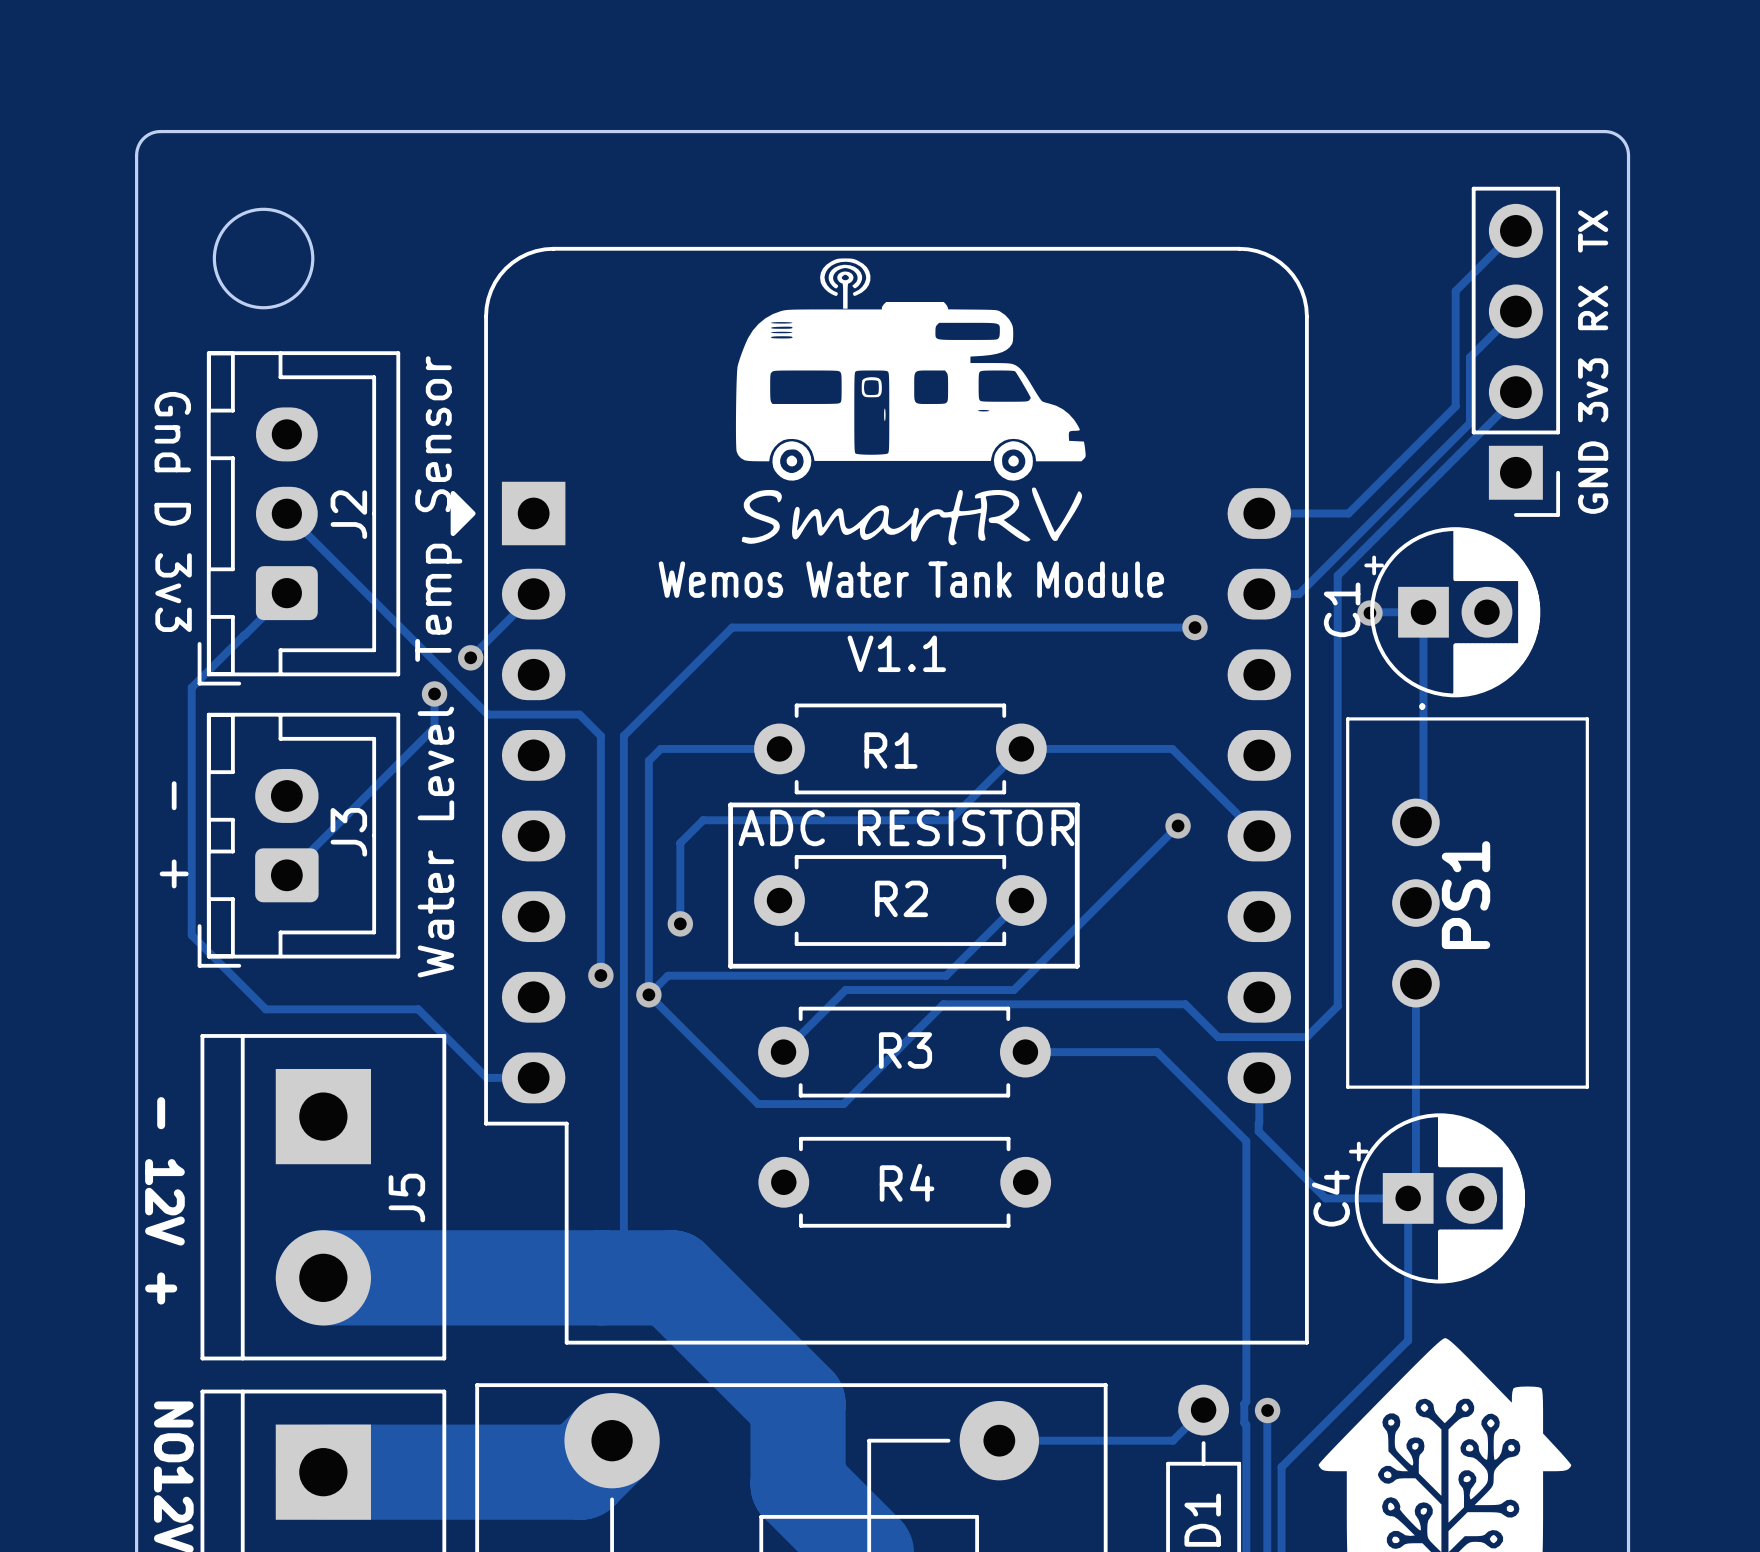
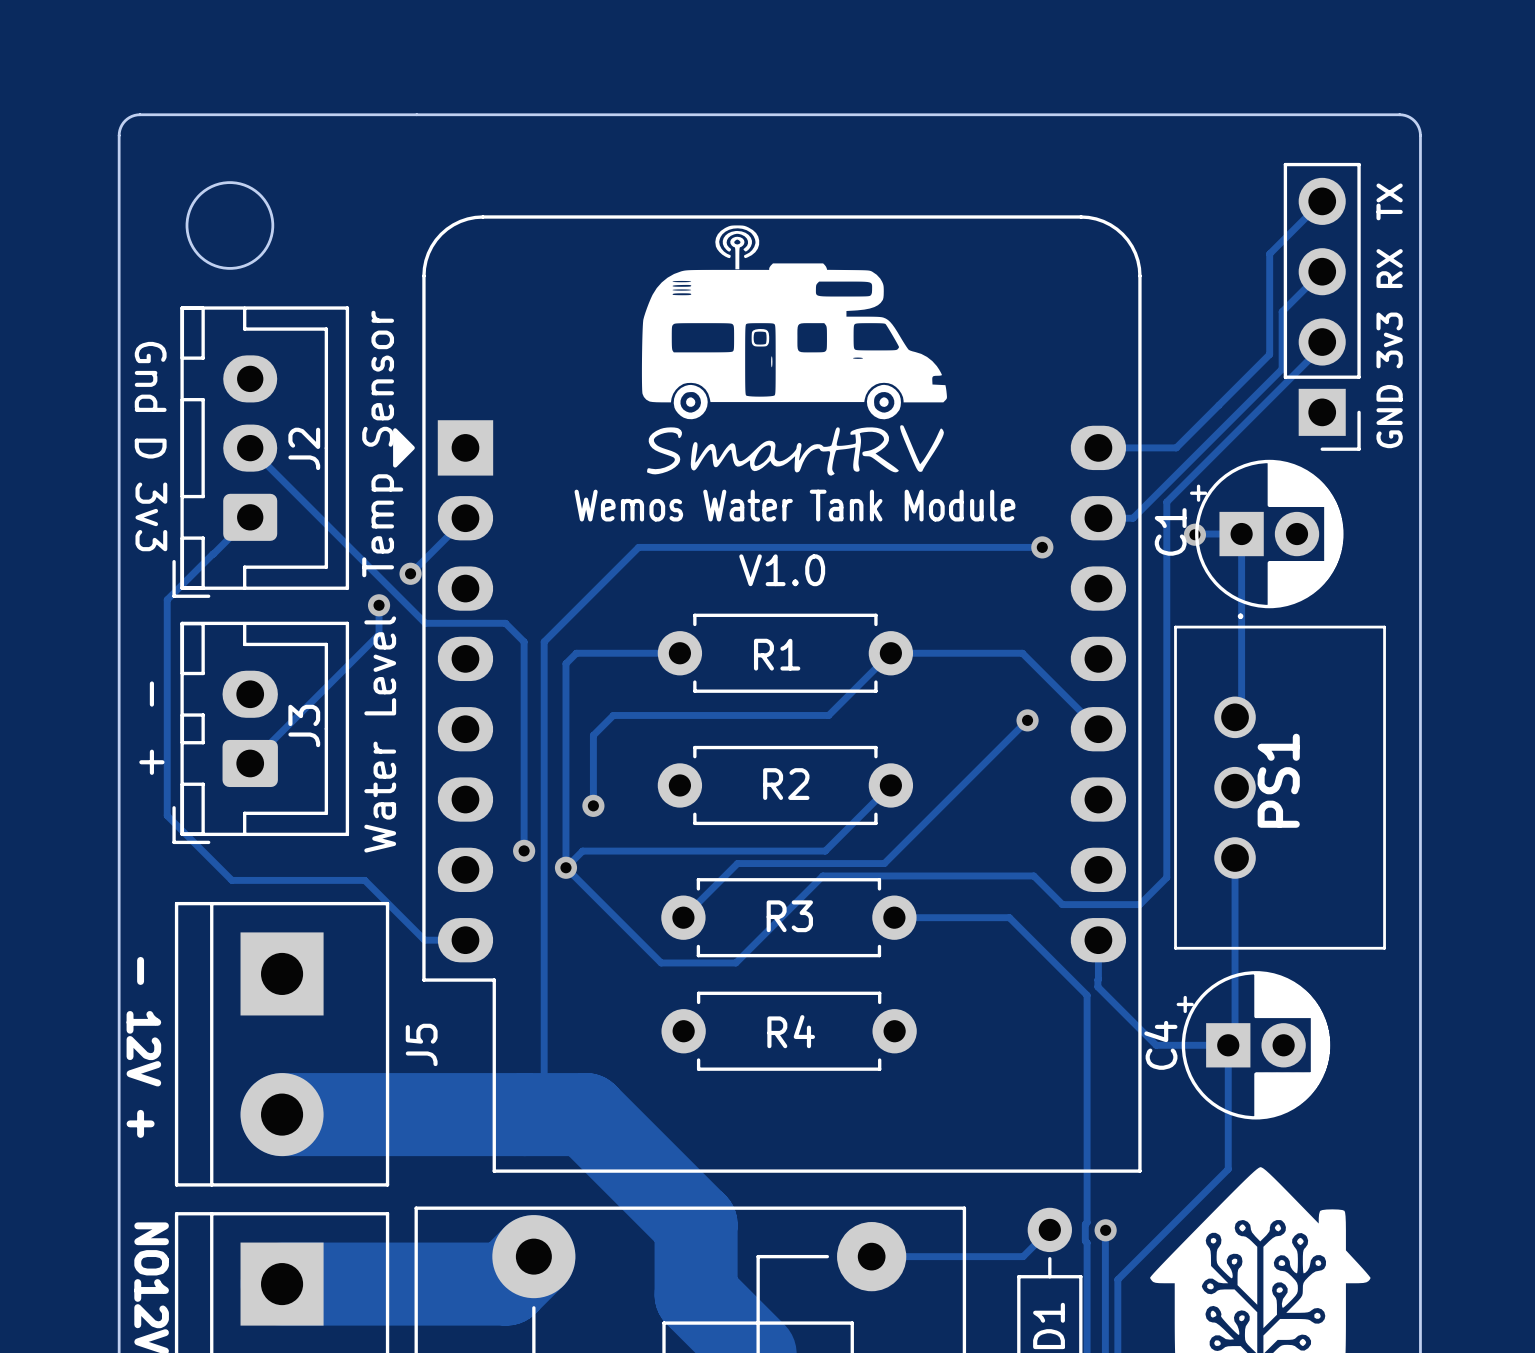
text: V1.1 (896, 653) -> V1.0 (782, 570)
line: (730, 804) (1077, 804) (1077, 966) (730, 966) (730, 804) -> none
text: ADC RESISTOR (906, 827) -> none
J5 name position: J5 (406, 1197) -> J5 (421, 1044)

